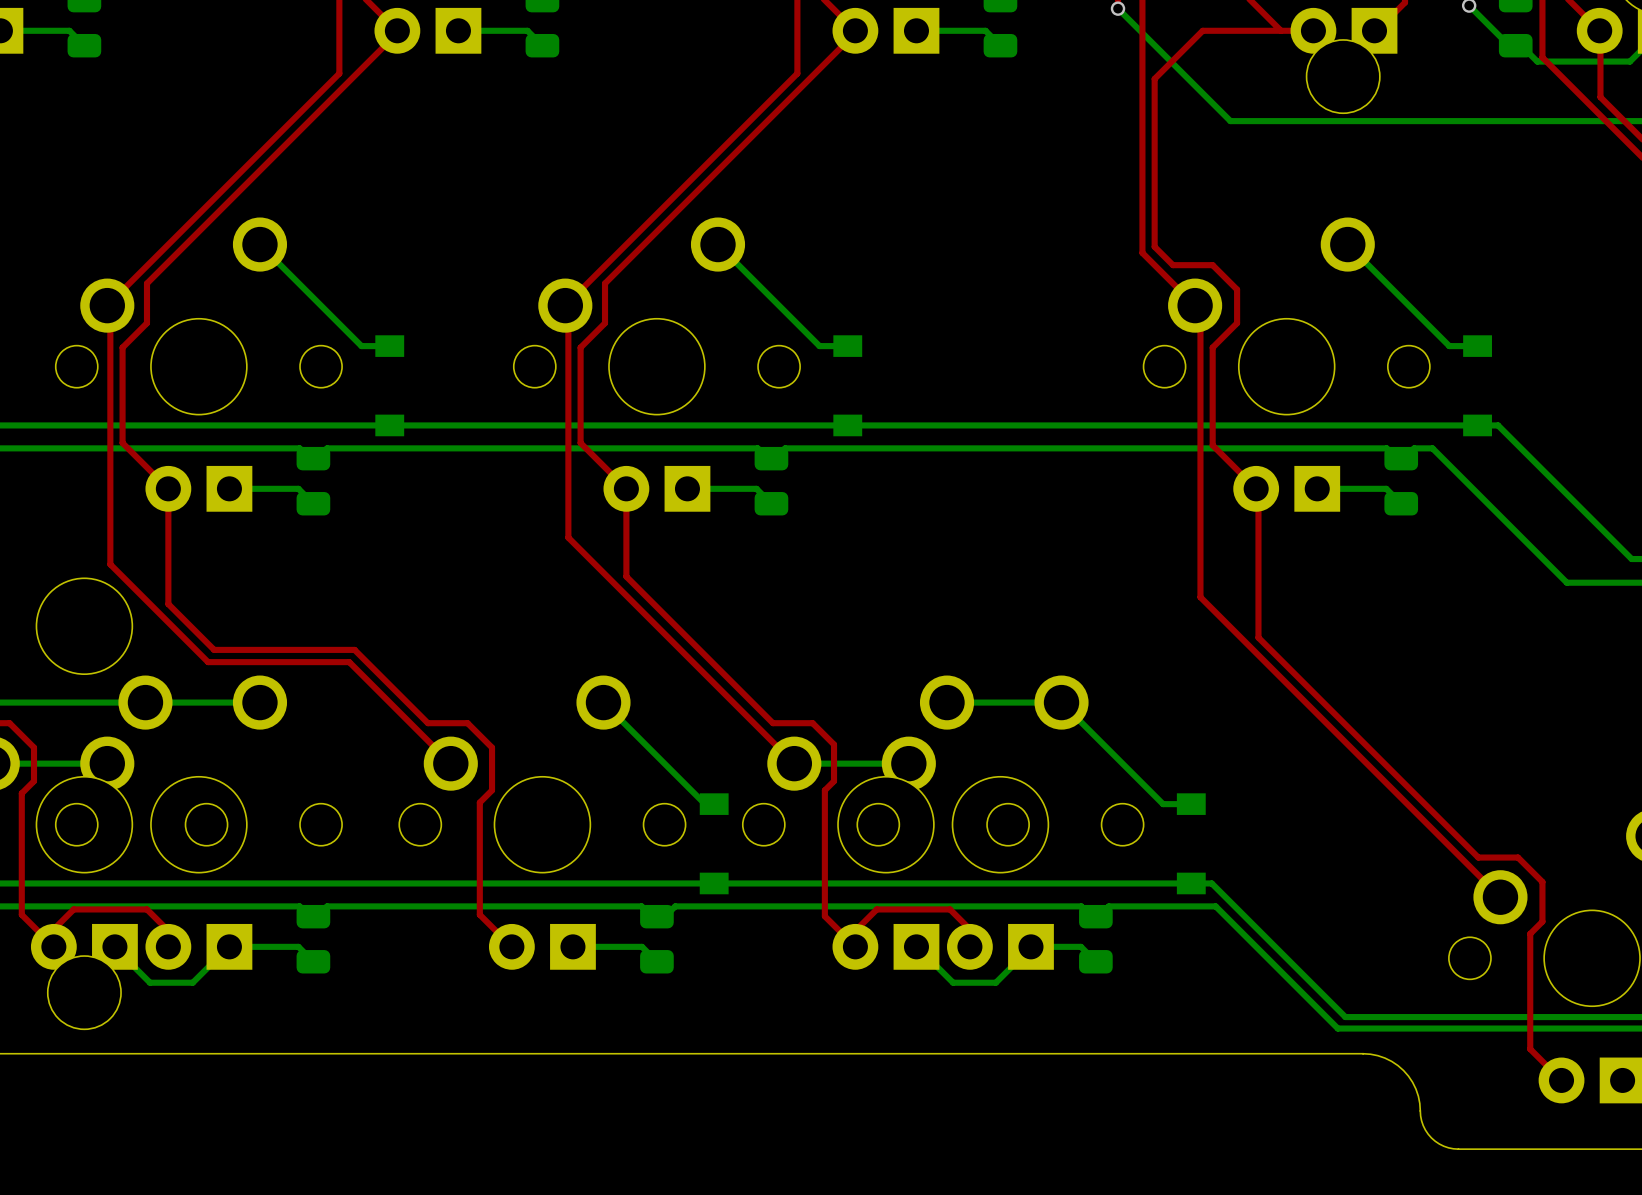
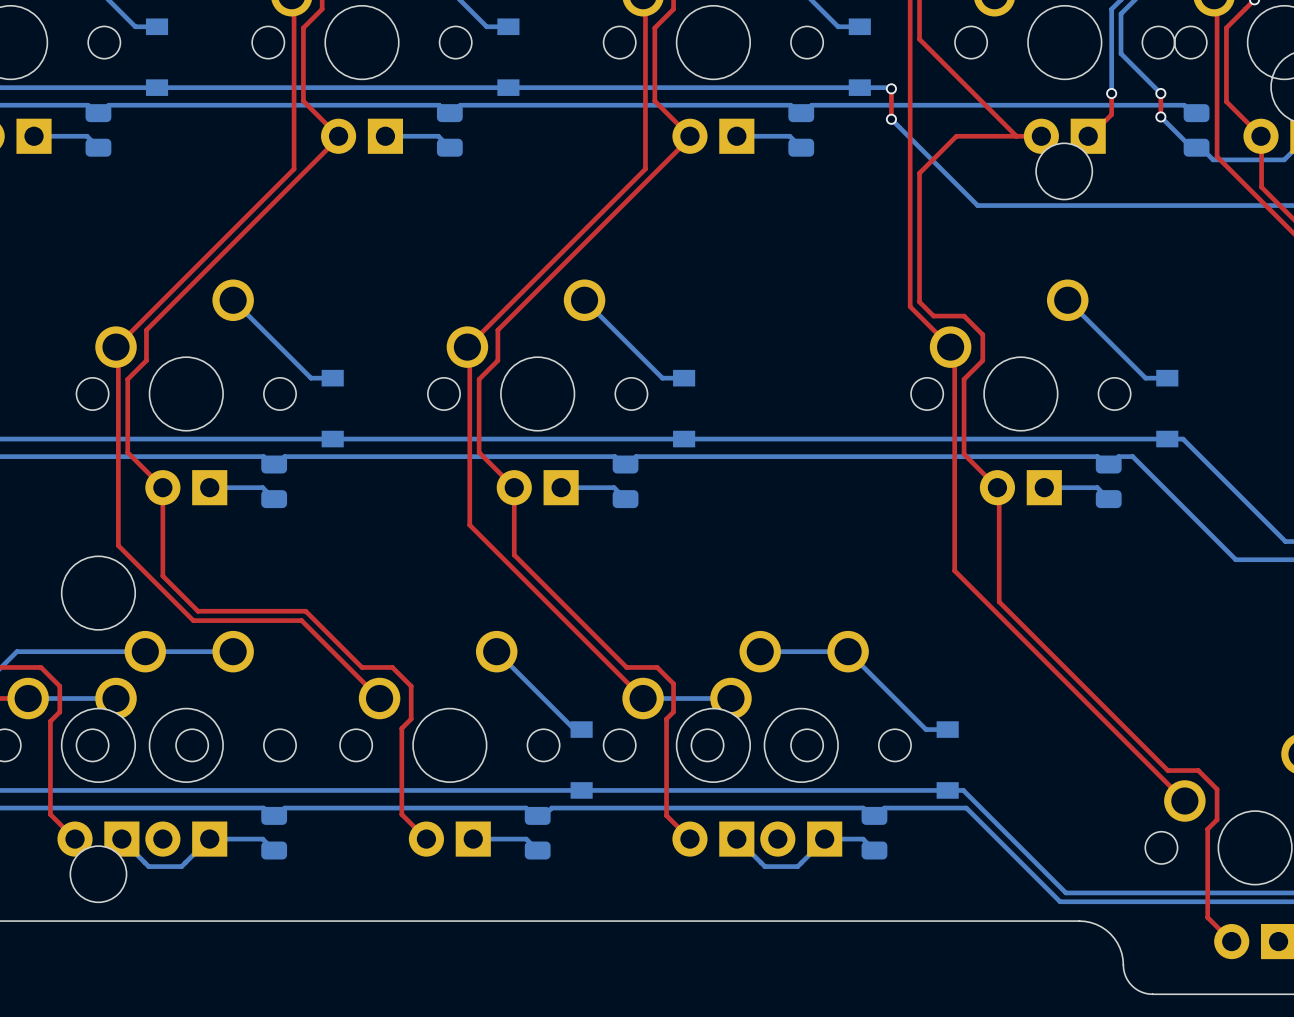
top track: (53, 946) (53, 929) (73, 909) (146, 909) (168, 930) (168, 946) -> none
top track: (855, 946) (855, 930) (876, 909) (950, 909) (969, 929) (969, 946) -> none

